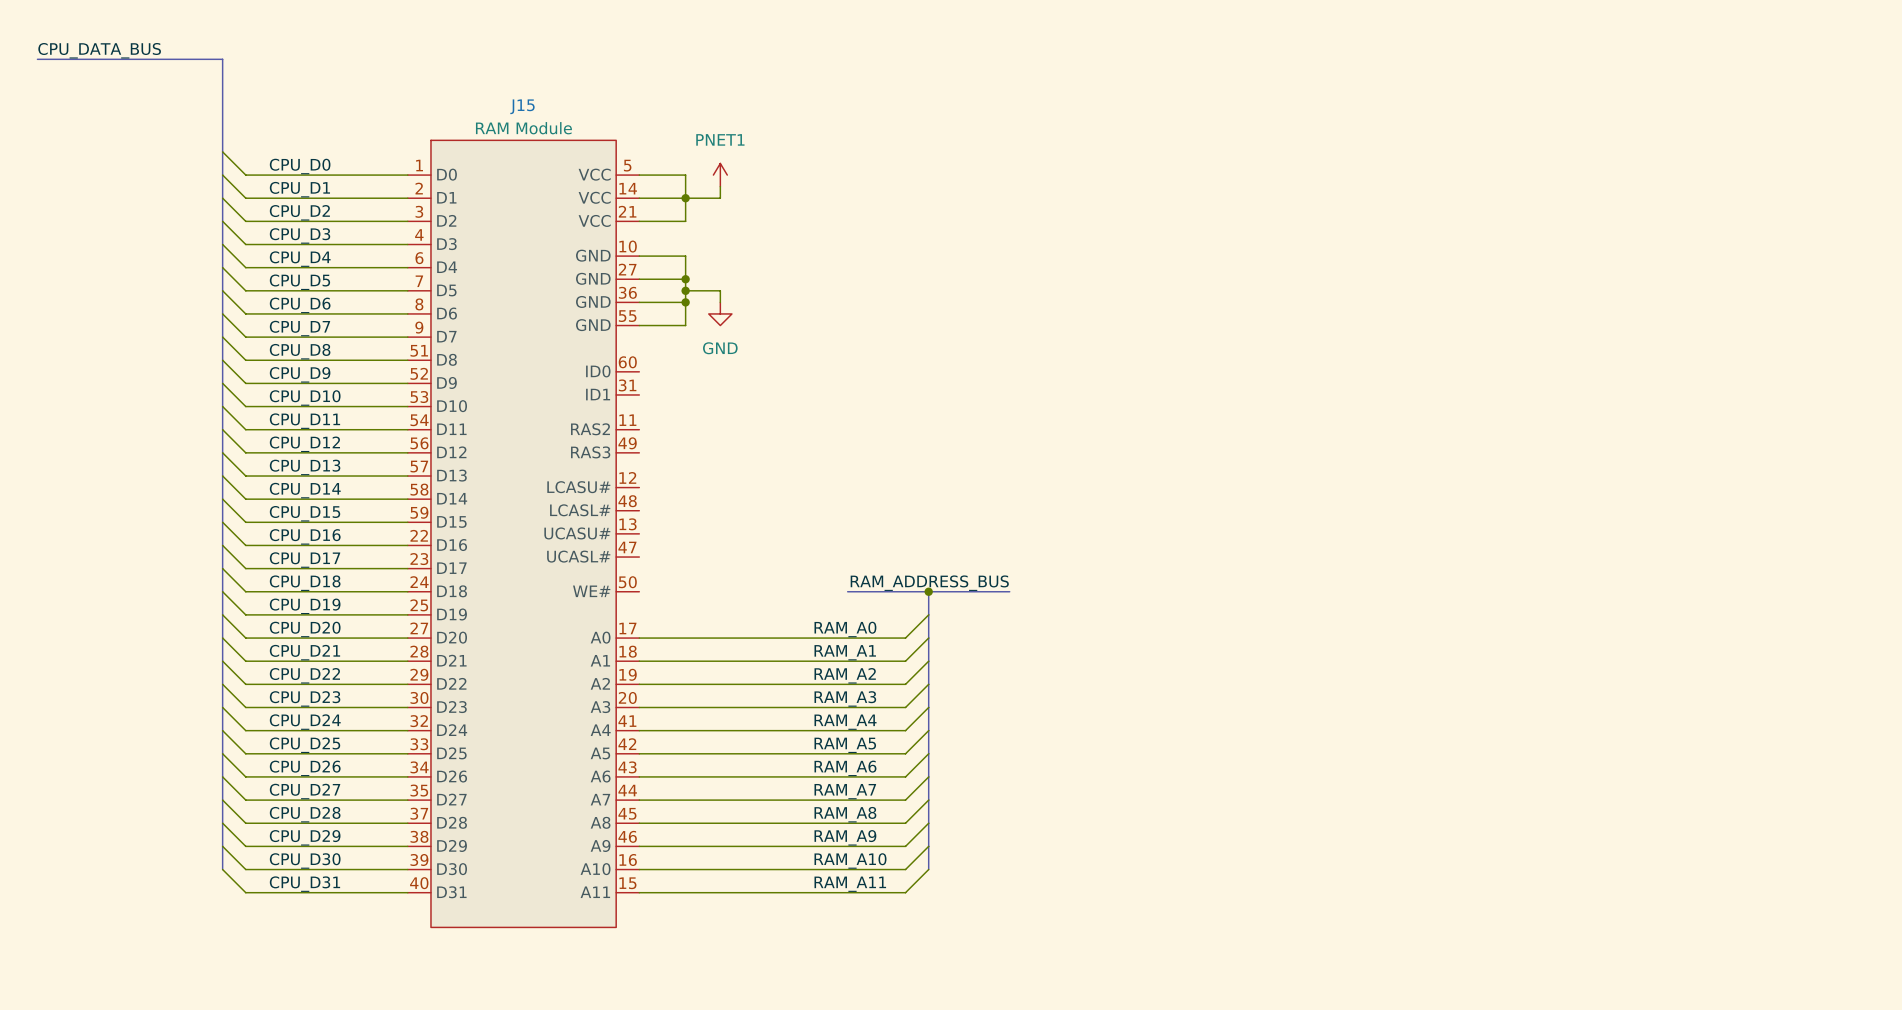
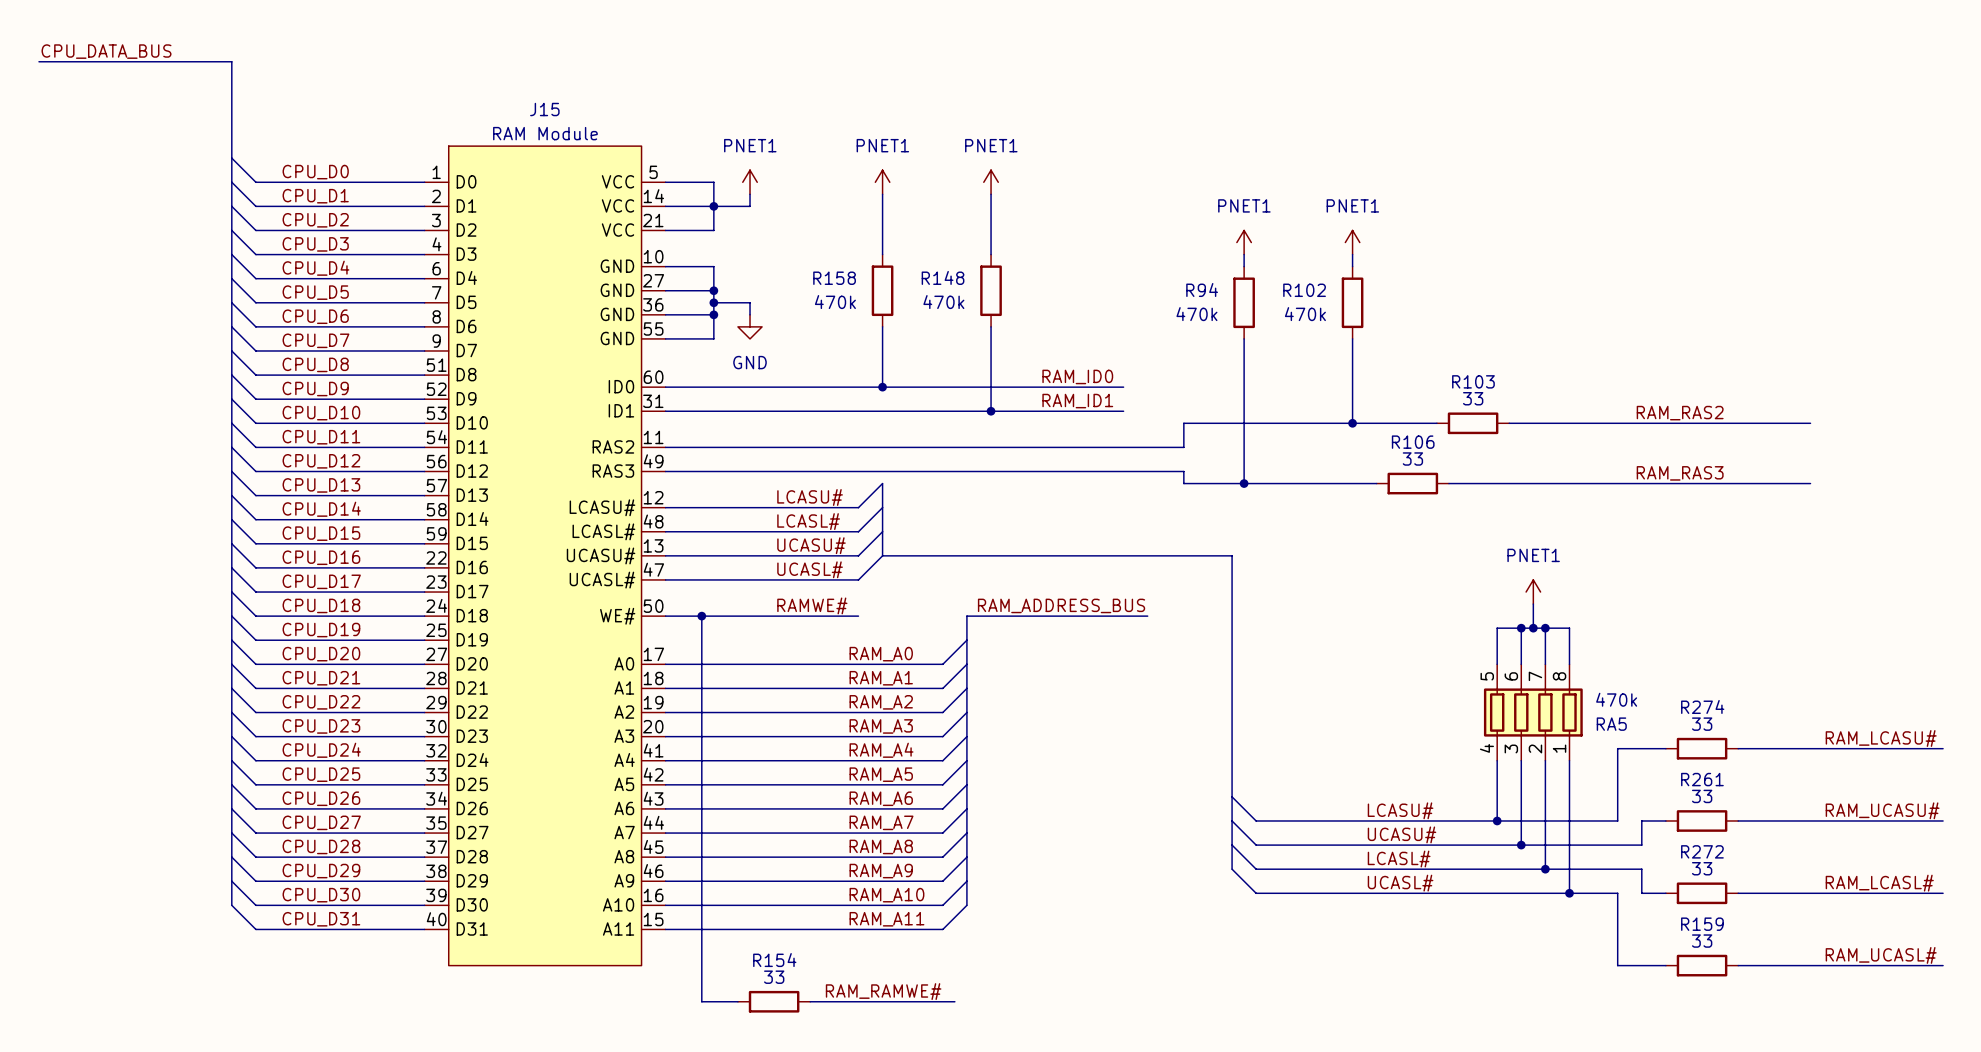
power symbol: none -> PNET1 (882, 182)
power symbol: none -> PNET1 (991, 182)
wire: none -> (882, 194) (882, 254)
wire: none -> (991, 194) (991, 254)
power symbol: none -> PNET1 (1244, 242)
power symbol: none -> PNET1 (1352, 242)
wire: none -> (1244, 254) (1244, 266)
wire: none -> (1352, 254) (1352, 266)
R158: none -> 470k (882, 290)
R148: none -> 470k (991, 290)
R94: none -> 470k (1244, 302)
R102: none -> 470k (1352, 302)
wire: none -> (882, 326) (882, 387)
wire: none -> (991, 326) (991, 411)
wire: none -> (1244, 338) (1244, 483)
wire: none -> (1352, 338) (1352, 423)
label: none -> RAM_ID0 (1077, 376)
wire: none -> (665, 387) (1123, 387)
junction: none -> (882, 387)
label: none -> RAM_ID1 (1077, 401)
wire: none -> (665, 411) (1123, 411)
junction: none -> (991, 411)
label: none -> RAM_RAS2 (1680, 413)
junction: none -> (1352, 423)
wire: none -> (1436, 423) (1183, 423) (1183, 447) (665, 447)
R103: none -> 33 (1473, 423)
wire: none -> (1509, 423) (1810, 423)
wire: none -> (665, 471) (1183, 471) (1183, 483) (1376, 483)
label: none -> RAM_RAS3 (1680, 473)
wire: none -> (882, 483) (858, 507) (665, 507)
bus: none -> (882, 483) (882, 555) (1232, 555) (1232, 869)
junction: none -> (1244, 483)
R106: none -> 33 (1412, 483)
wire: none -> (1448, 483) (1810, 483)
label: none -> LCASU# (810, 497)
wire: none -> (882, 507) (858, 531) (665, 531)
label: none -> LCASL# (808, 521)
wire: none -> (882, 531) (858, 555) (665, 555)
label: none -> UCASU# (811, 545)
wire: none -> (882, 555) (858, 579) (665, 579)
label: none -> UCASL# (810, 569)
power symbol: none -> PNET1 (1533, 592)
wire: none -> (1533, 604) (1533, 628)
label: none -> RAMWE# (812, 605)
label position: RAM_ADDRESS_BUS (929, 583) -> RAM_ADDRESS_BUS (1061, 605)
wire: none -> (665, 616) (858, 616)
wire: none -> (701, 616) (701, 1001) (737, 1001)
junction: none -> (701, 616)
bus: (847, 591) (928, 591) -> none
junction: (928, 591) -> none
bus: none -> (1051, 616) (1147, 616)
wire: none -> (1521, 628) (1521, 664)
junction: none -> (1521, 628)
junction: none -> (1533, 628)
wire: none -> (1545, 628) (1545, 664)
junction: none -> (1545, 628)
wire: none -> (1497, 664) (1497, 628) (1569, 628) (1569, 664)
RA5: none -> 470k (1533, 712)
label: none -> RAM_LCASU# (1881, 738)
wire: none -> (1665, 748) (1617, 748) (1617, 820) (1256, 820) (1232, 796)
R274: none -> 33 (1702, 748)
wire: none -> (1738, 748) (1943, 748)
wire: none -> (1497, 760) (1497, 820)
wire: none -> (1521, 760) (1521, 845)
wire: none -> (1545, 760) (1545, 869)
wire: none -> (1569, 760) (1569, 893)
label: none -> LCASU# (1400, 810)
label: none -> RAM_UCASU# (1882, 810)
wire: none -> (1232, 820) (1256, 845) (1641, 845) (1641, 820) (1665, 820)
junction: none -> (1497, 820)
R261: none -> 33 (1702, 820)
wire: none -> (1738, 820) (1943, 820)
label: none -> UCASU# (1402, 834)
wire: none -> (1232, 845) (1256, 869) (1641, 869) (1641, 893) (1665, 893)
junction: none -> (1521, 845)
label: none -> LCASL# (1399, 859)
wire: none -> (1232, 869) (1256, 893) (1617, 893) (1617, 965) (1665, 965)
junction: none -> (1545, 869)
label: none -> UCASL# (1400, 883)
label: none -> RAM_LCASL# (1879, 883)
junction: none -> (1569, 893)
R272: none -> 33 (1702, 893)
wire: none -> (1738, 893) (1943, 893)
label: none -> RAM_UCASL# (1881, 955)
R159: none -> 33 (1702, 965)
wire: none -> (1738, 965) (1943, 965)
label: none -> RAM_RAMWE# (883, 991)
R154: none -> 33 (774, 1001)
wire: none -> (810, 1001) (954, 1001)

